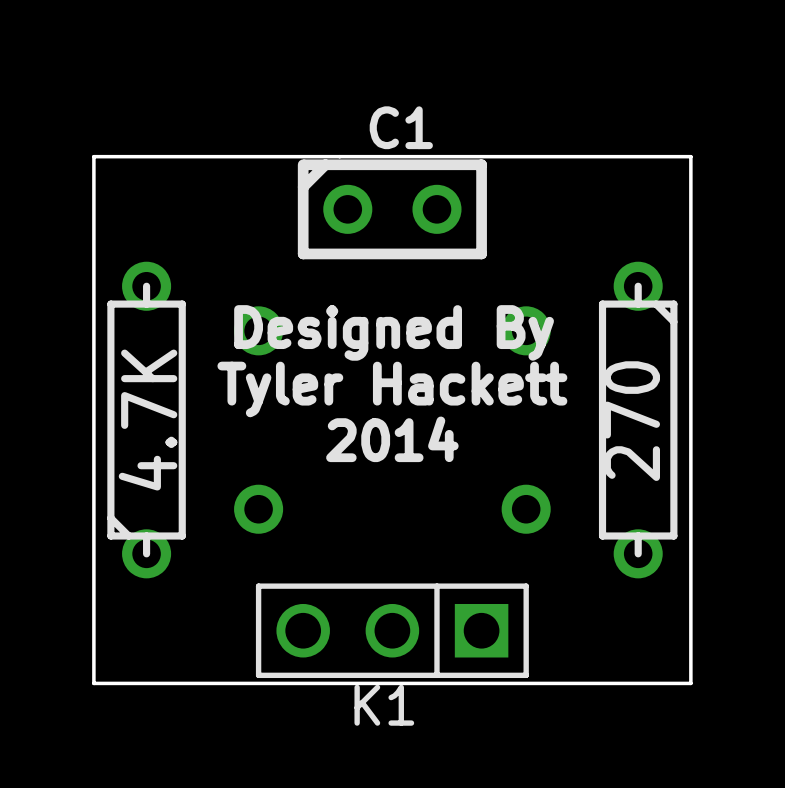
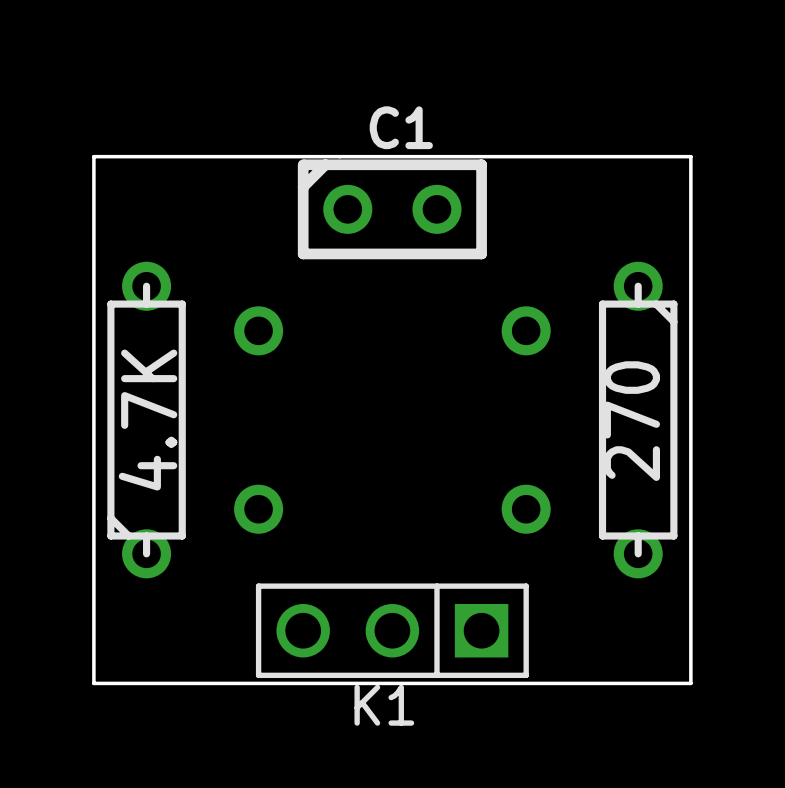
text: Designed By (394, 332) -> none
text: Tyler Hackett (392, 389) -> none
text: 2014 (392, 439) -> none

